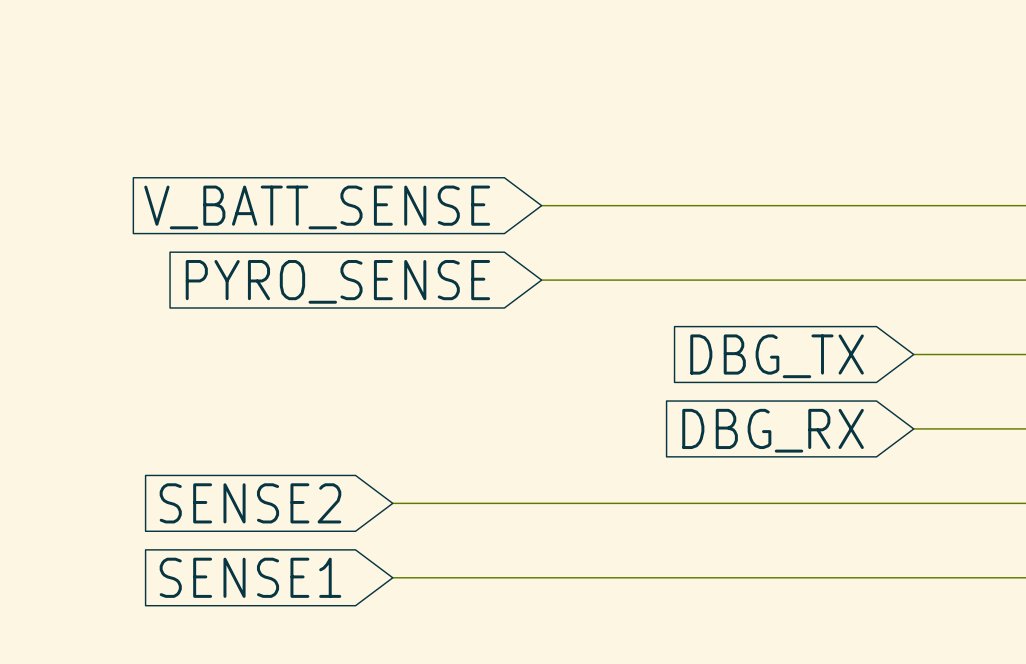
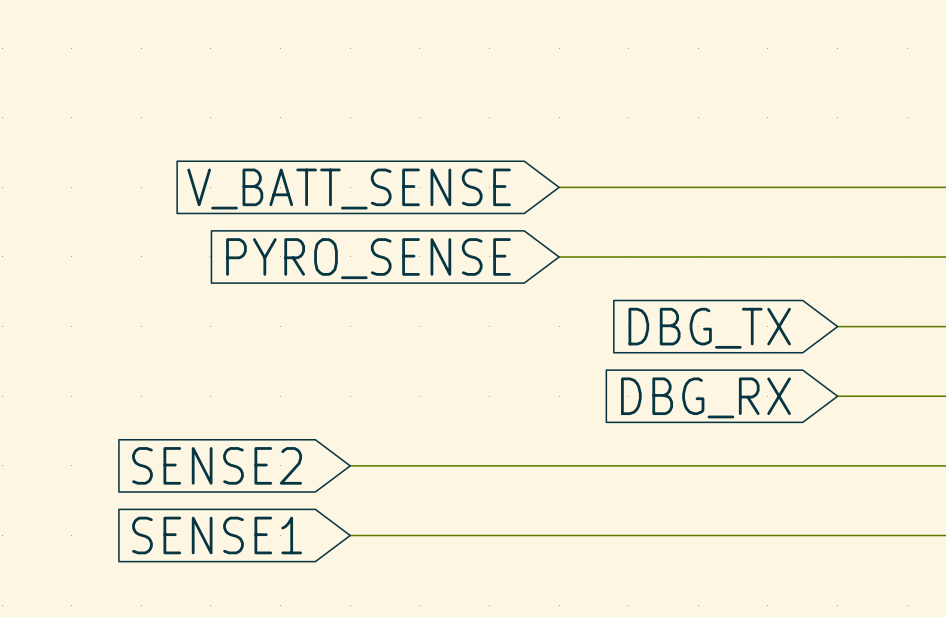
wire: (541, 205) (616, 205) -> none
global label position: V_BATT_SENSE (317, 207) -> V_BATT_SENSE (349, 189)
wire: (541, 280) (616, 280) -> none
global label position: PYRO_SENSE (337, 281) -> PYRO_SENSE (368, 258)

